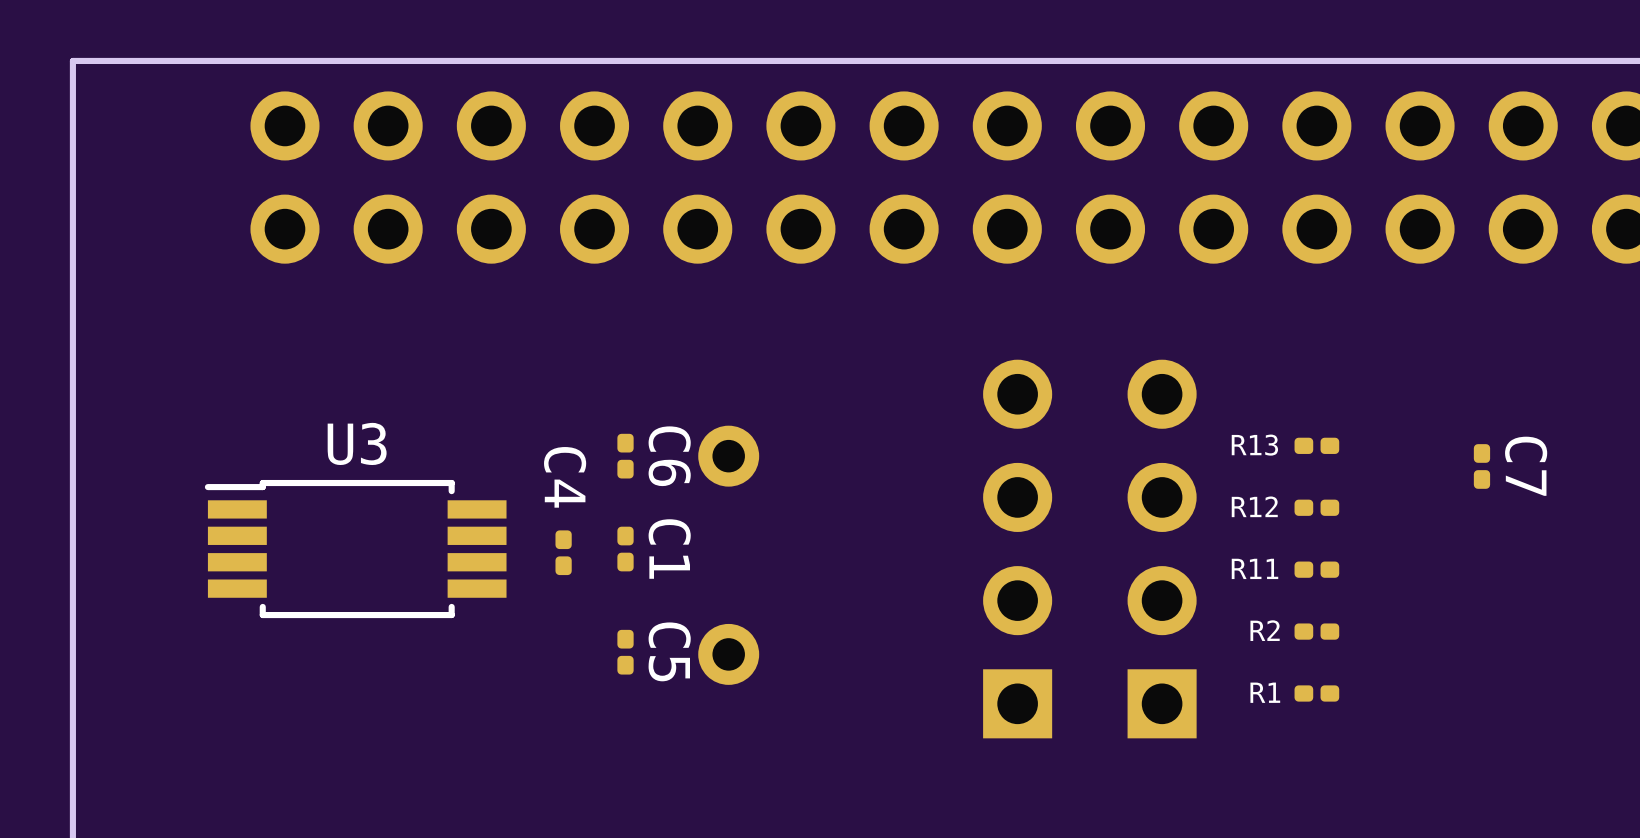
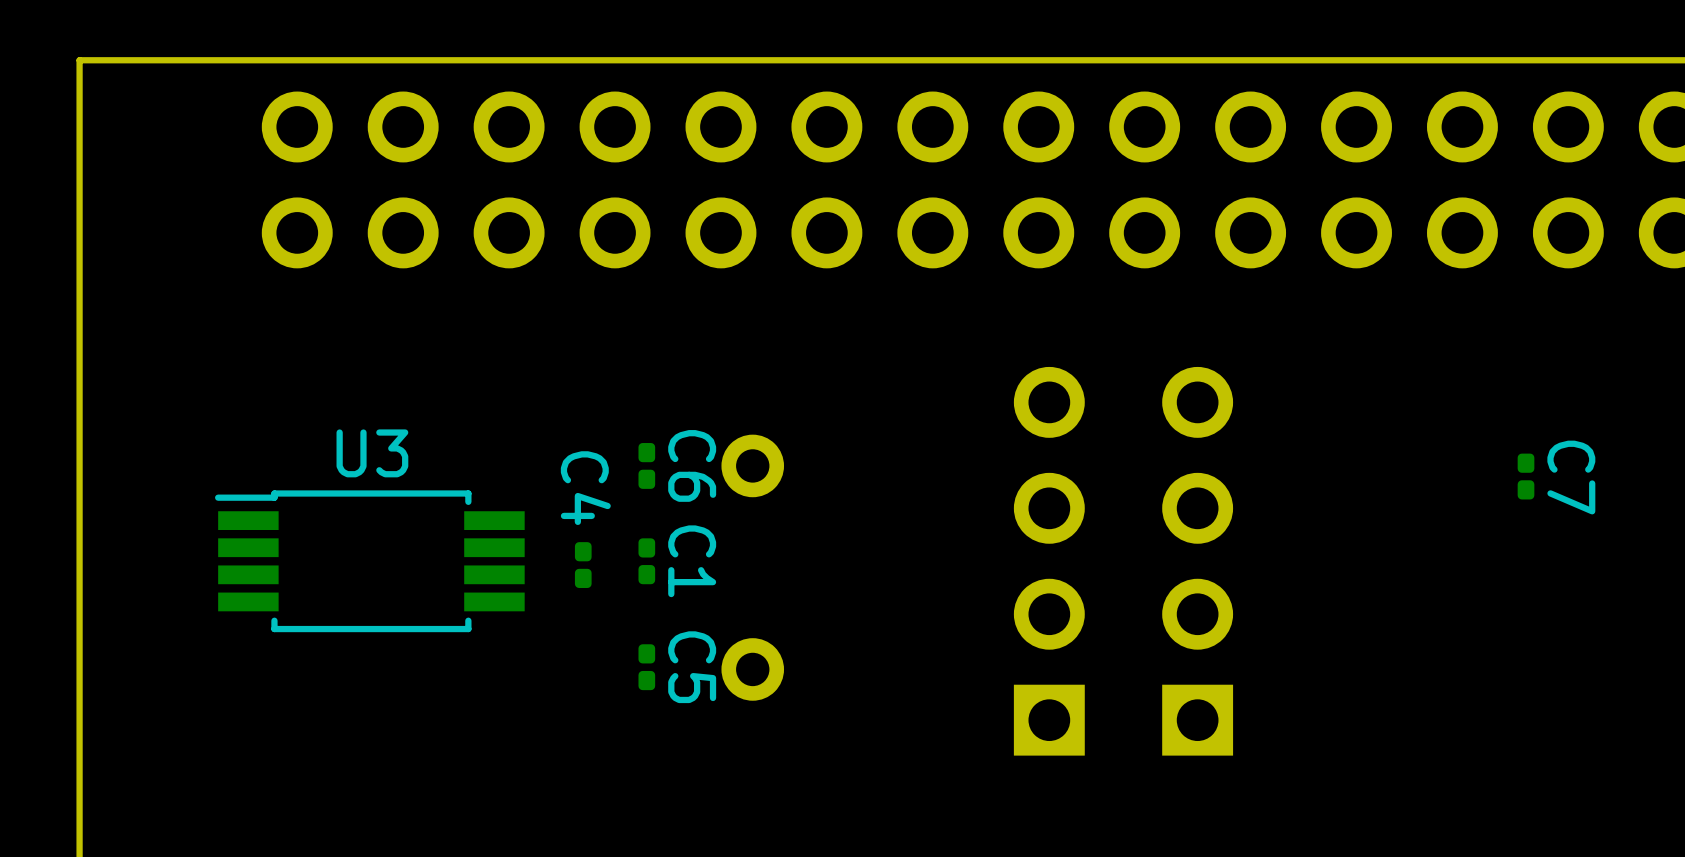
R13: (1316, 445) -> none
R12: (1316, 507) -> none
R11: (1316, 569) -> none
R2: (1316, 631) -> none
R1: (1316, 693) -> none

